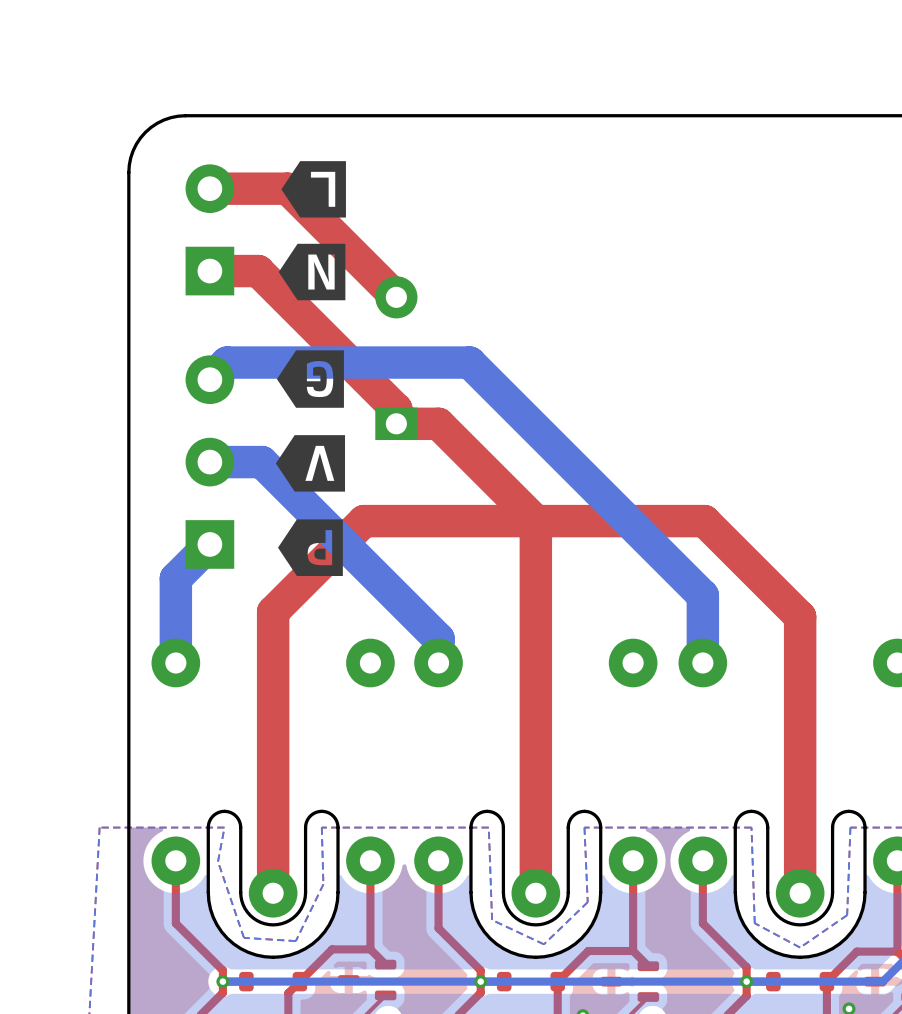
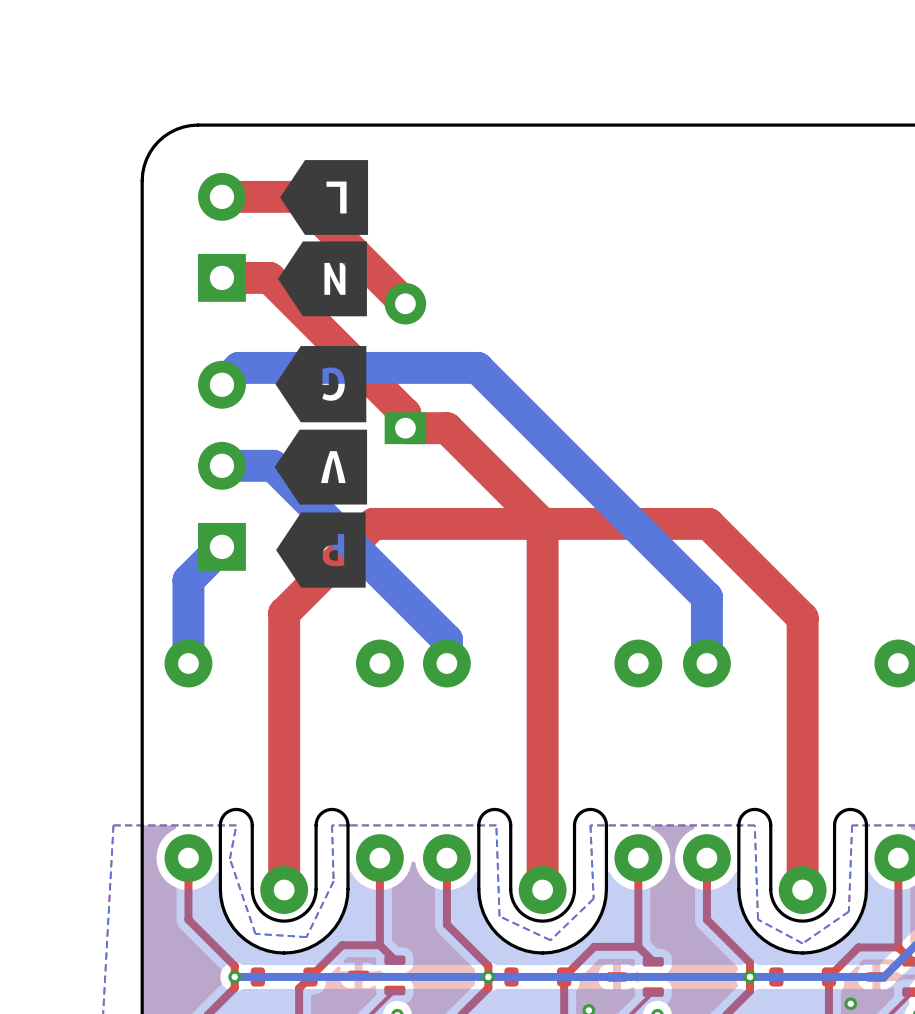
drawing shape: [281, 161, 346, 218] -> [280, 160, 369, 235]
drawing shape: [278, 243, 346, 301] -> [278, 241, 367, 317]
drawing shape: [276, 350, 344, 408] -> [275, 346, 367, 423]
drawing shape: [275, 435, 346, 492] -> [274, 429, 368, 505]
drawing shape: [278, 519, 343, 577] -> [276, 512, 366, 588]

